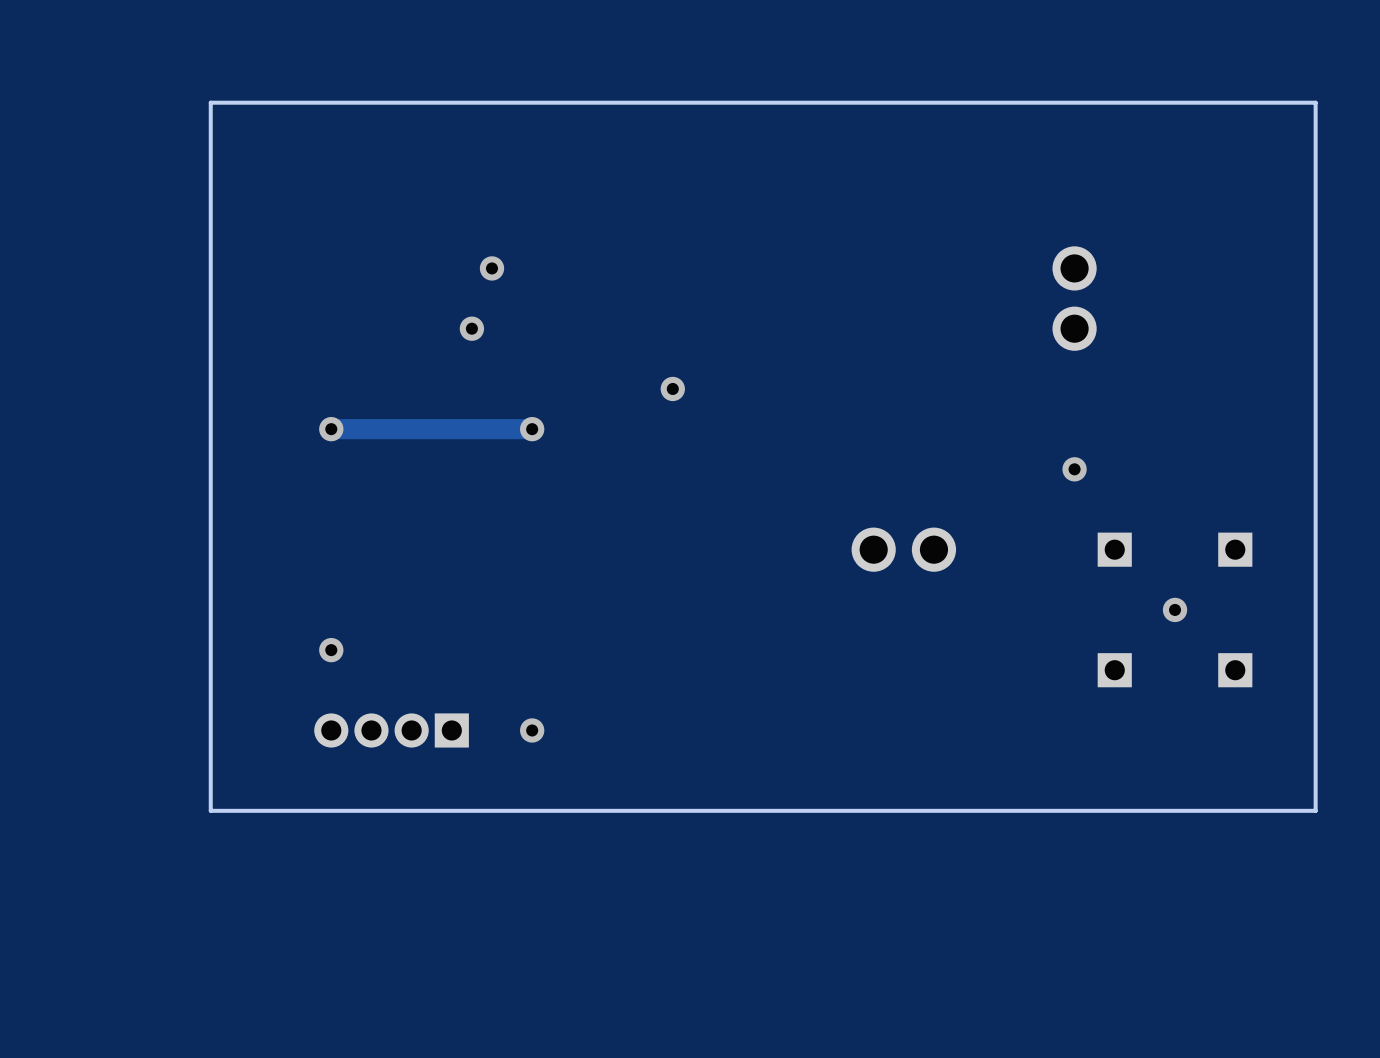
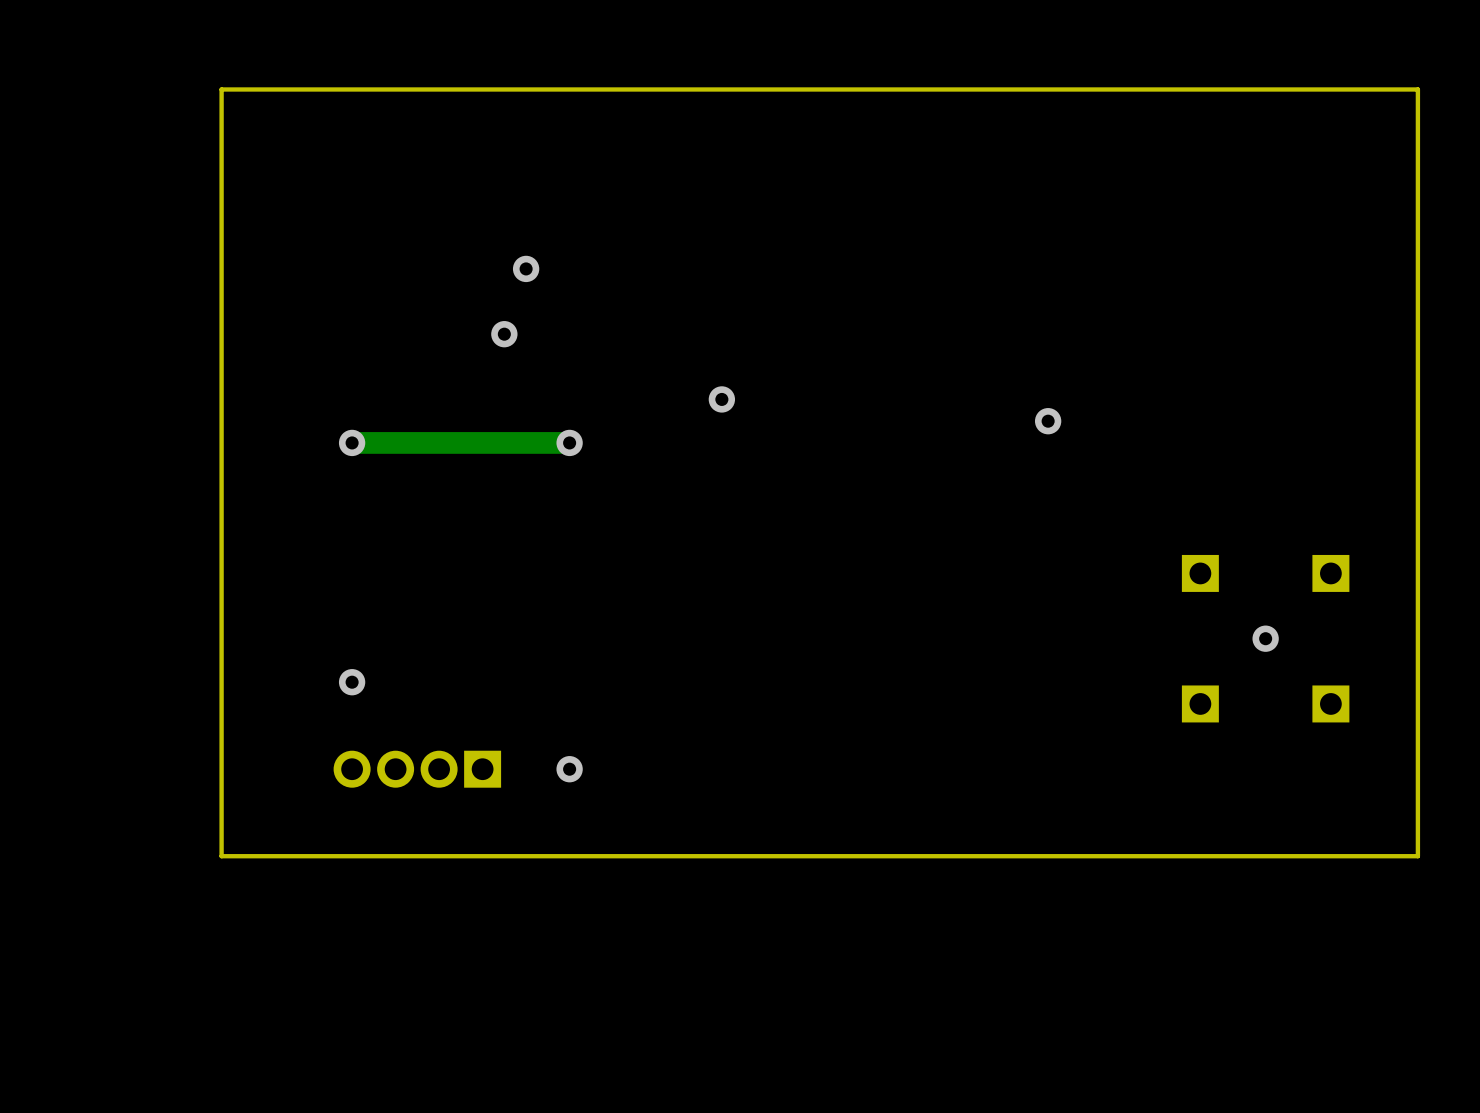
part: (1074, 298) -> none
via position: (1074, 469) -> (1048, 421)
part: (903, 549) -> none

